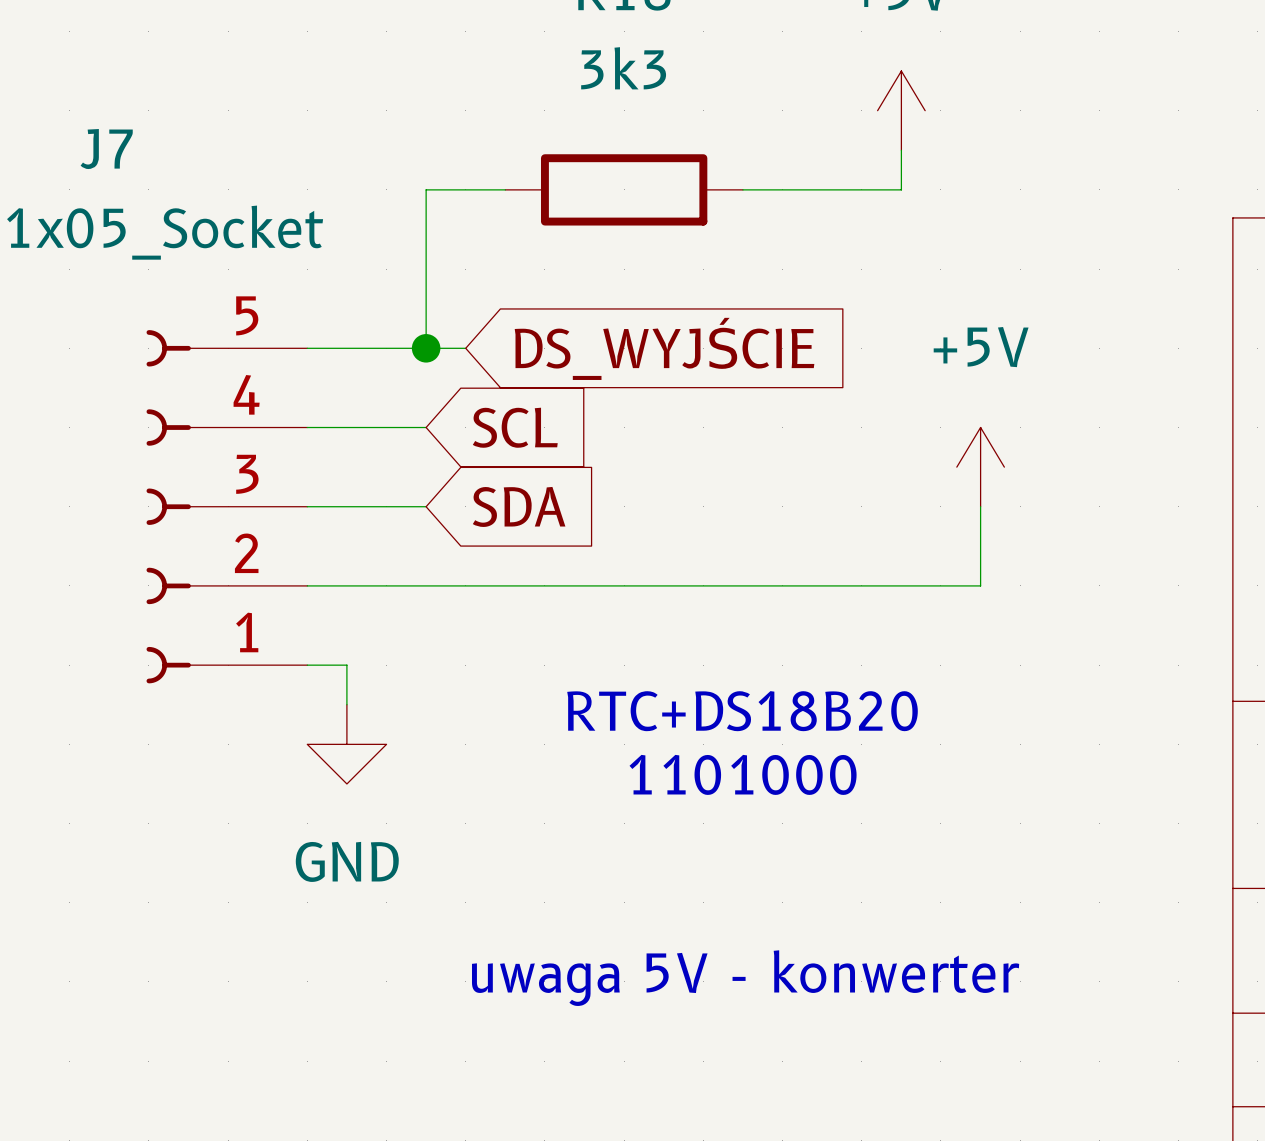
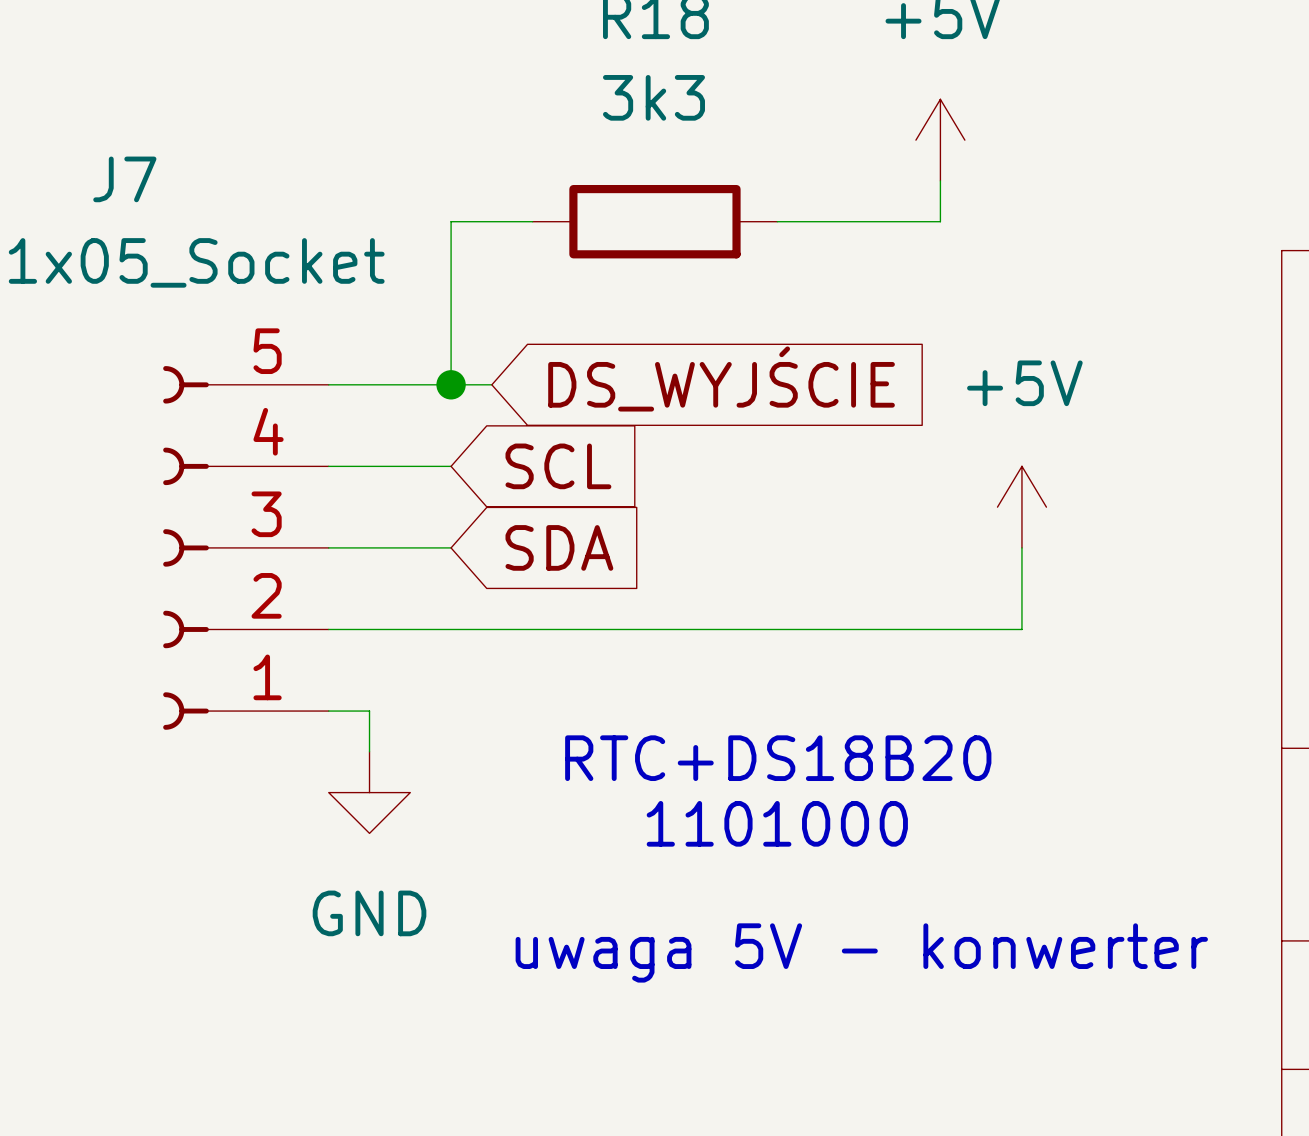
text position: uwaga 5V - konwerter (745, 978) -> uwaga 5V - konwerter (861, 952)

